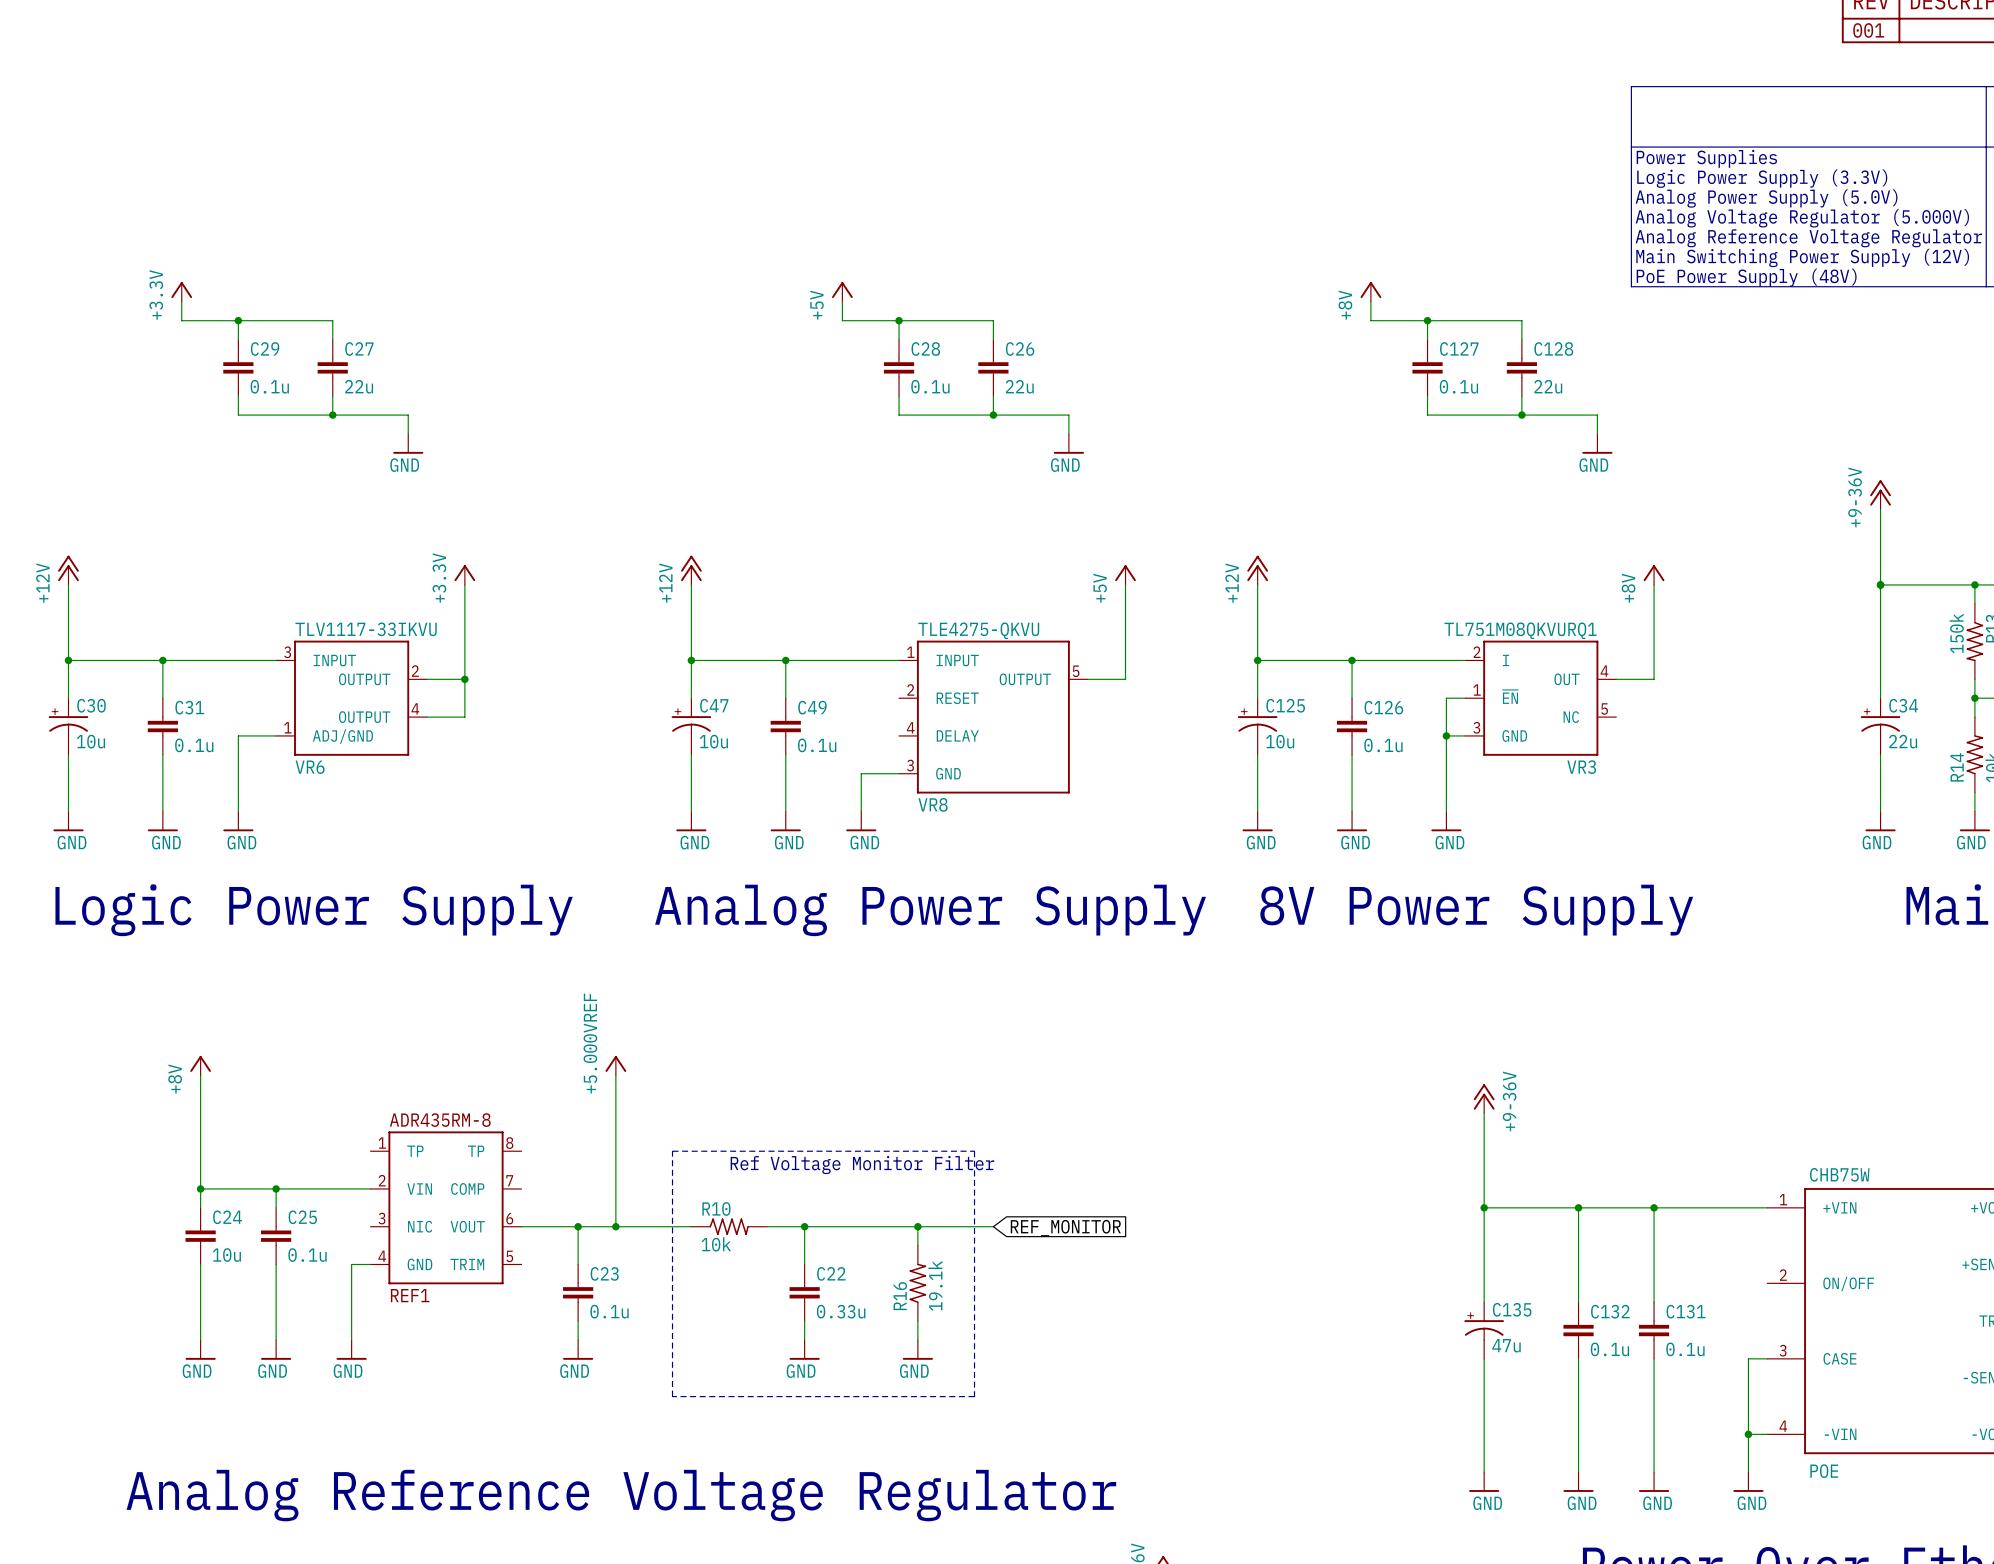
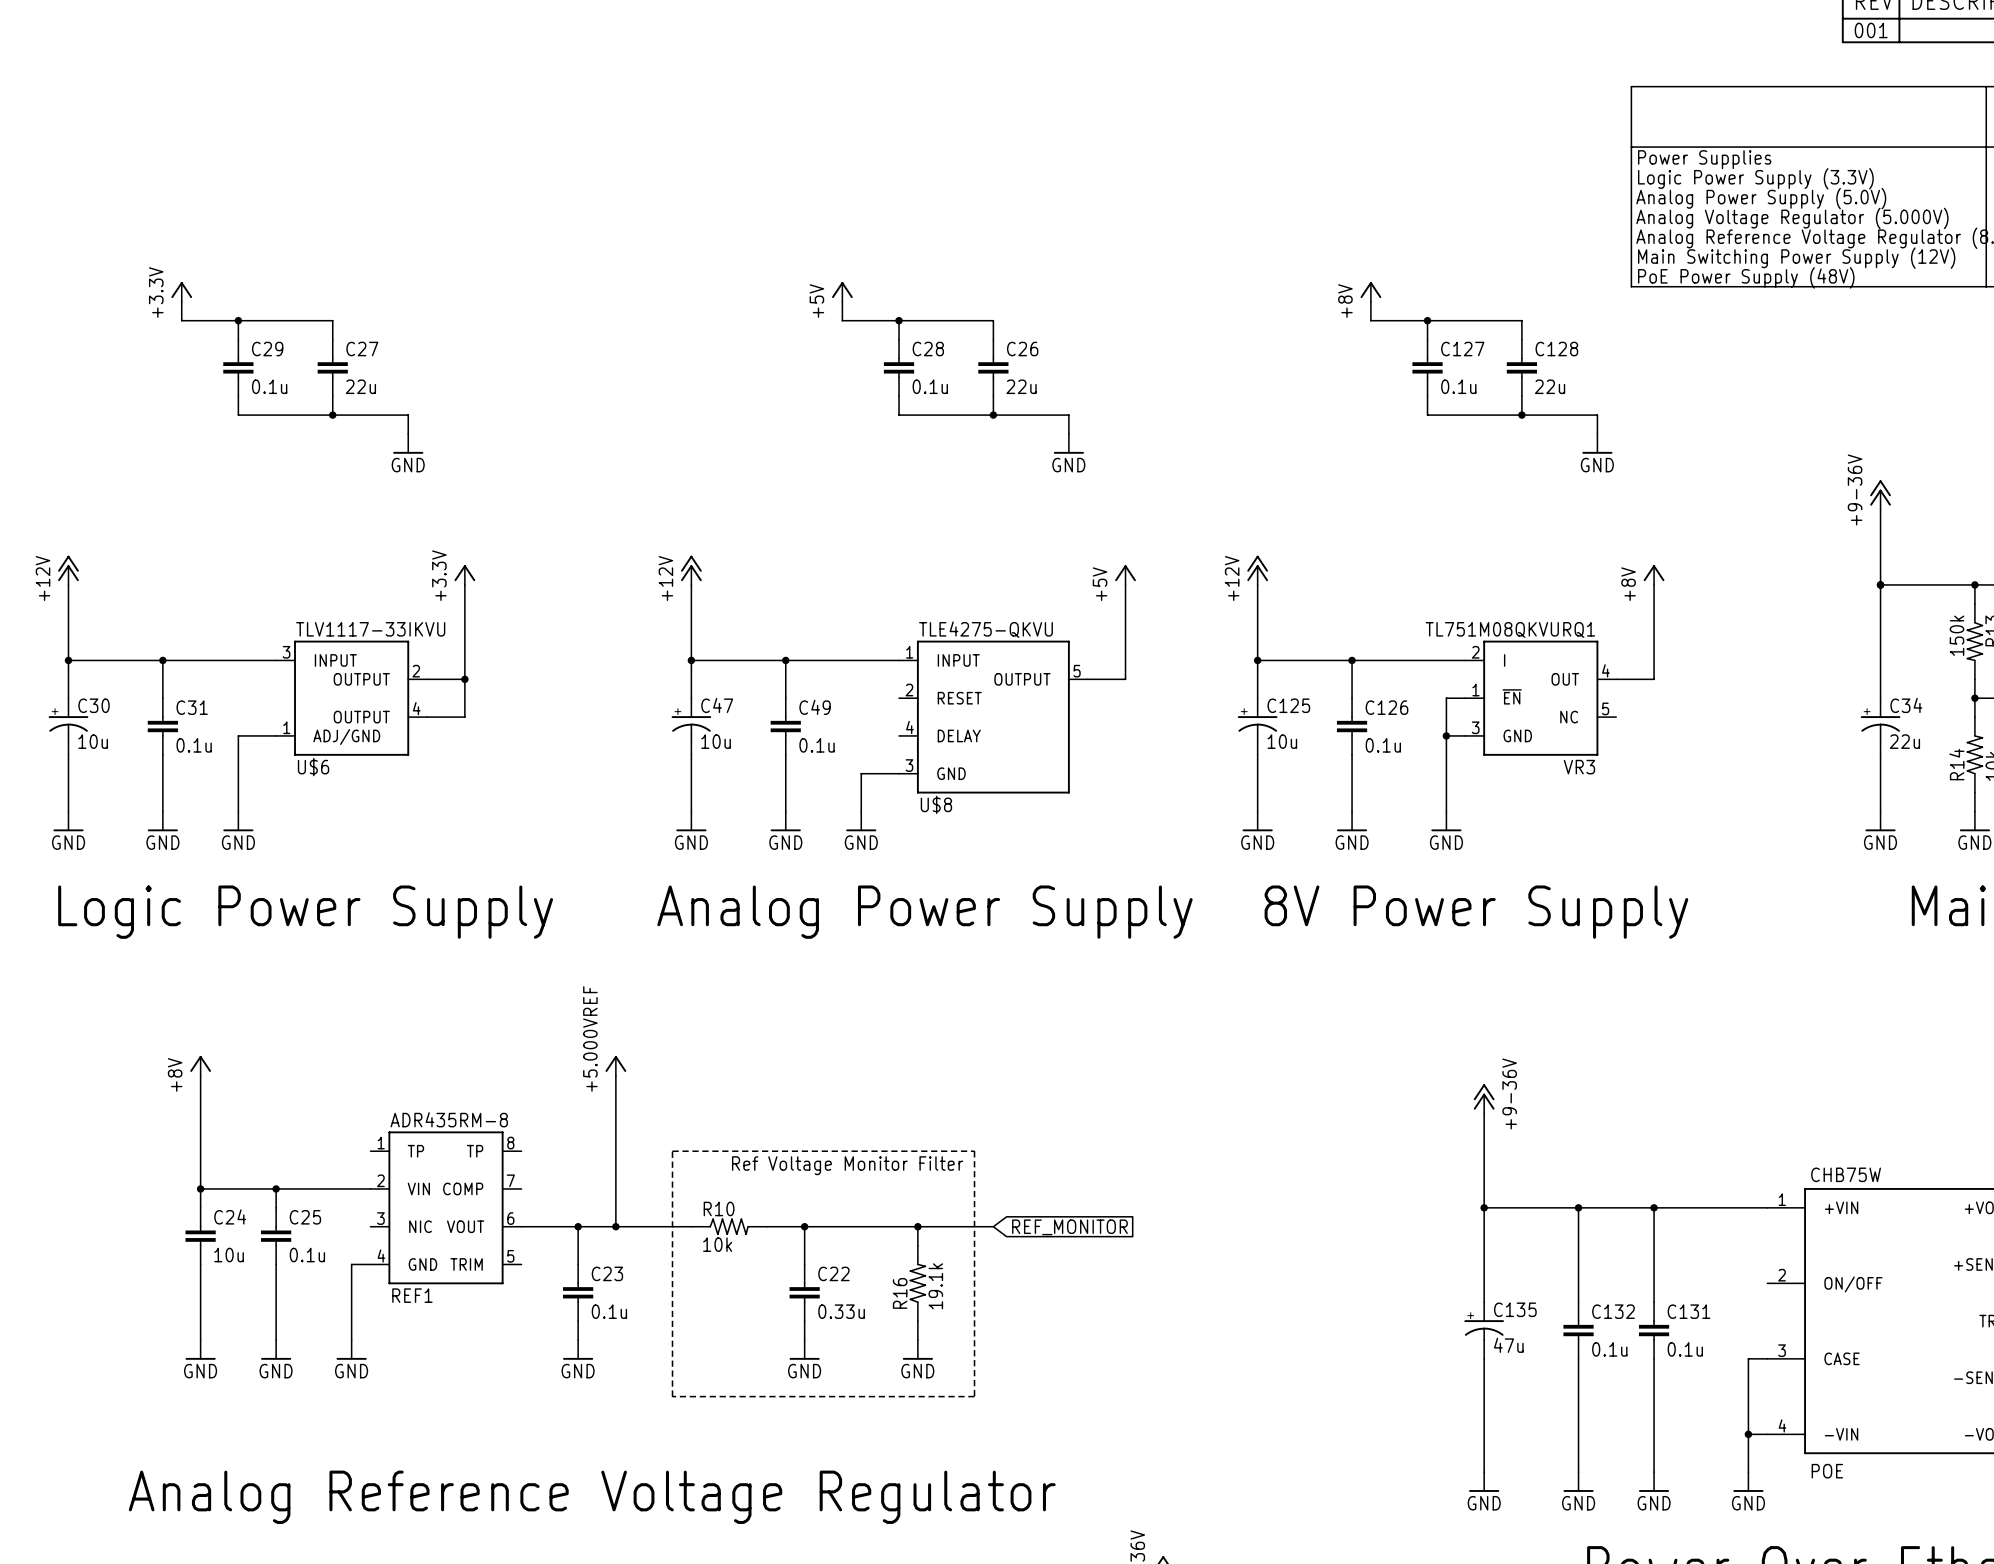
VR6 name: VR6 (310, 767) -> U$6 (313, 767)
VR8 name: VR8 (933, 804) -> U$8 (936, 804)

